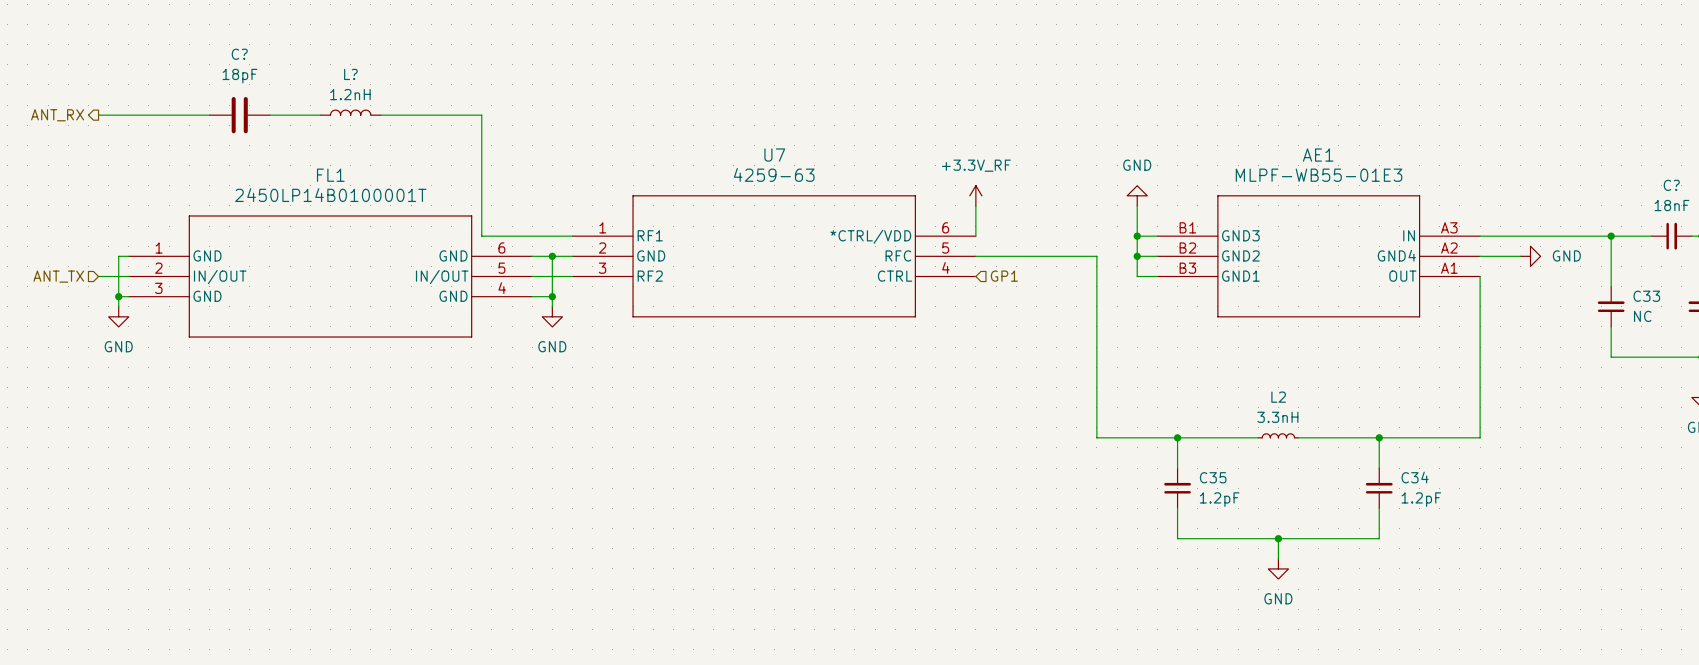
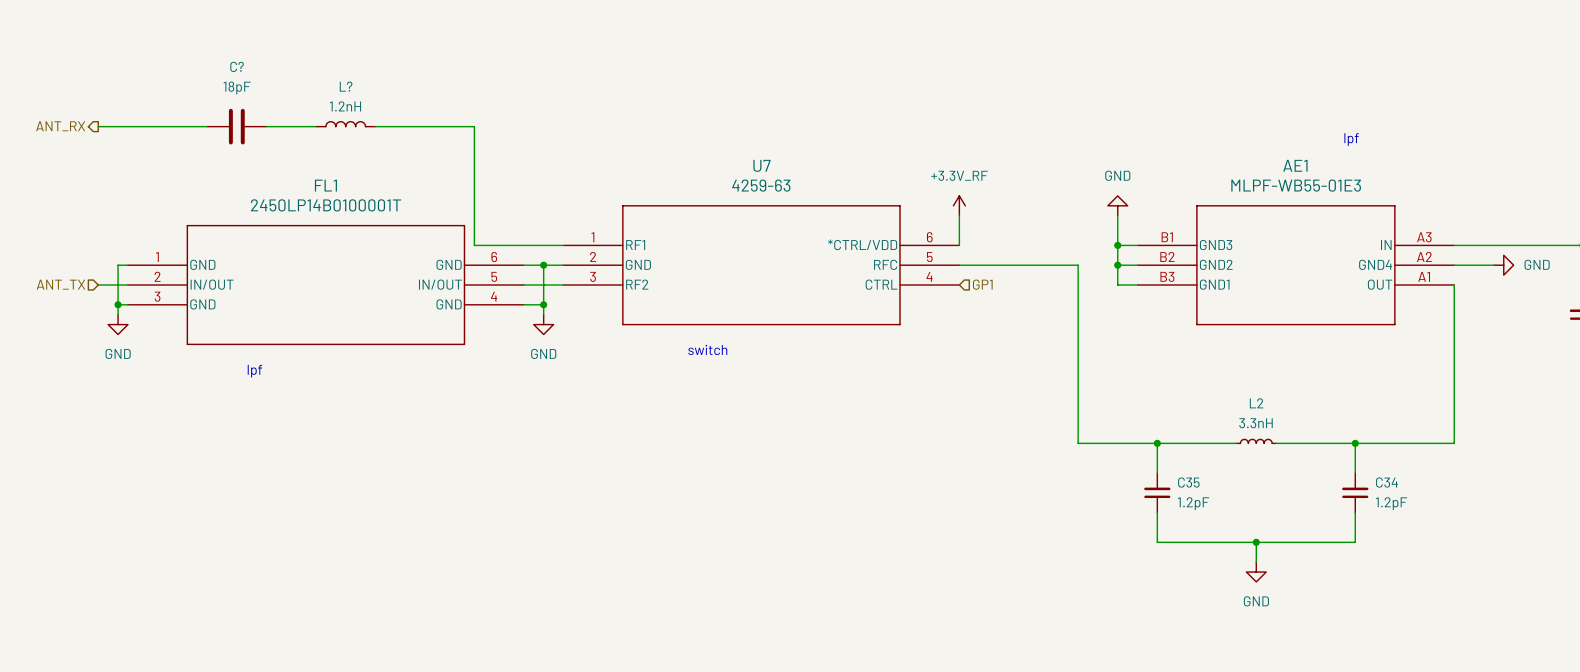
text: none -> lpf (1351, 139)
text: none -> switch (707, 349)
text: none -> lpf (254, 371)

